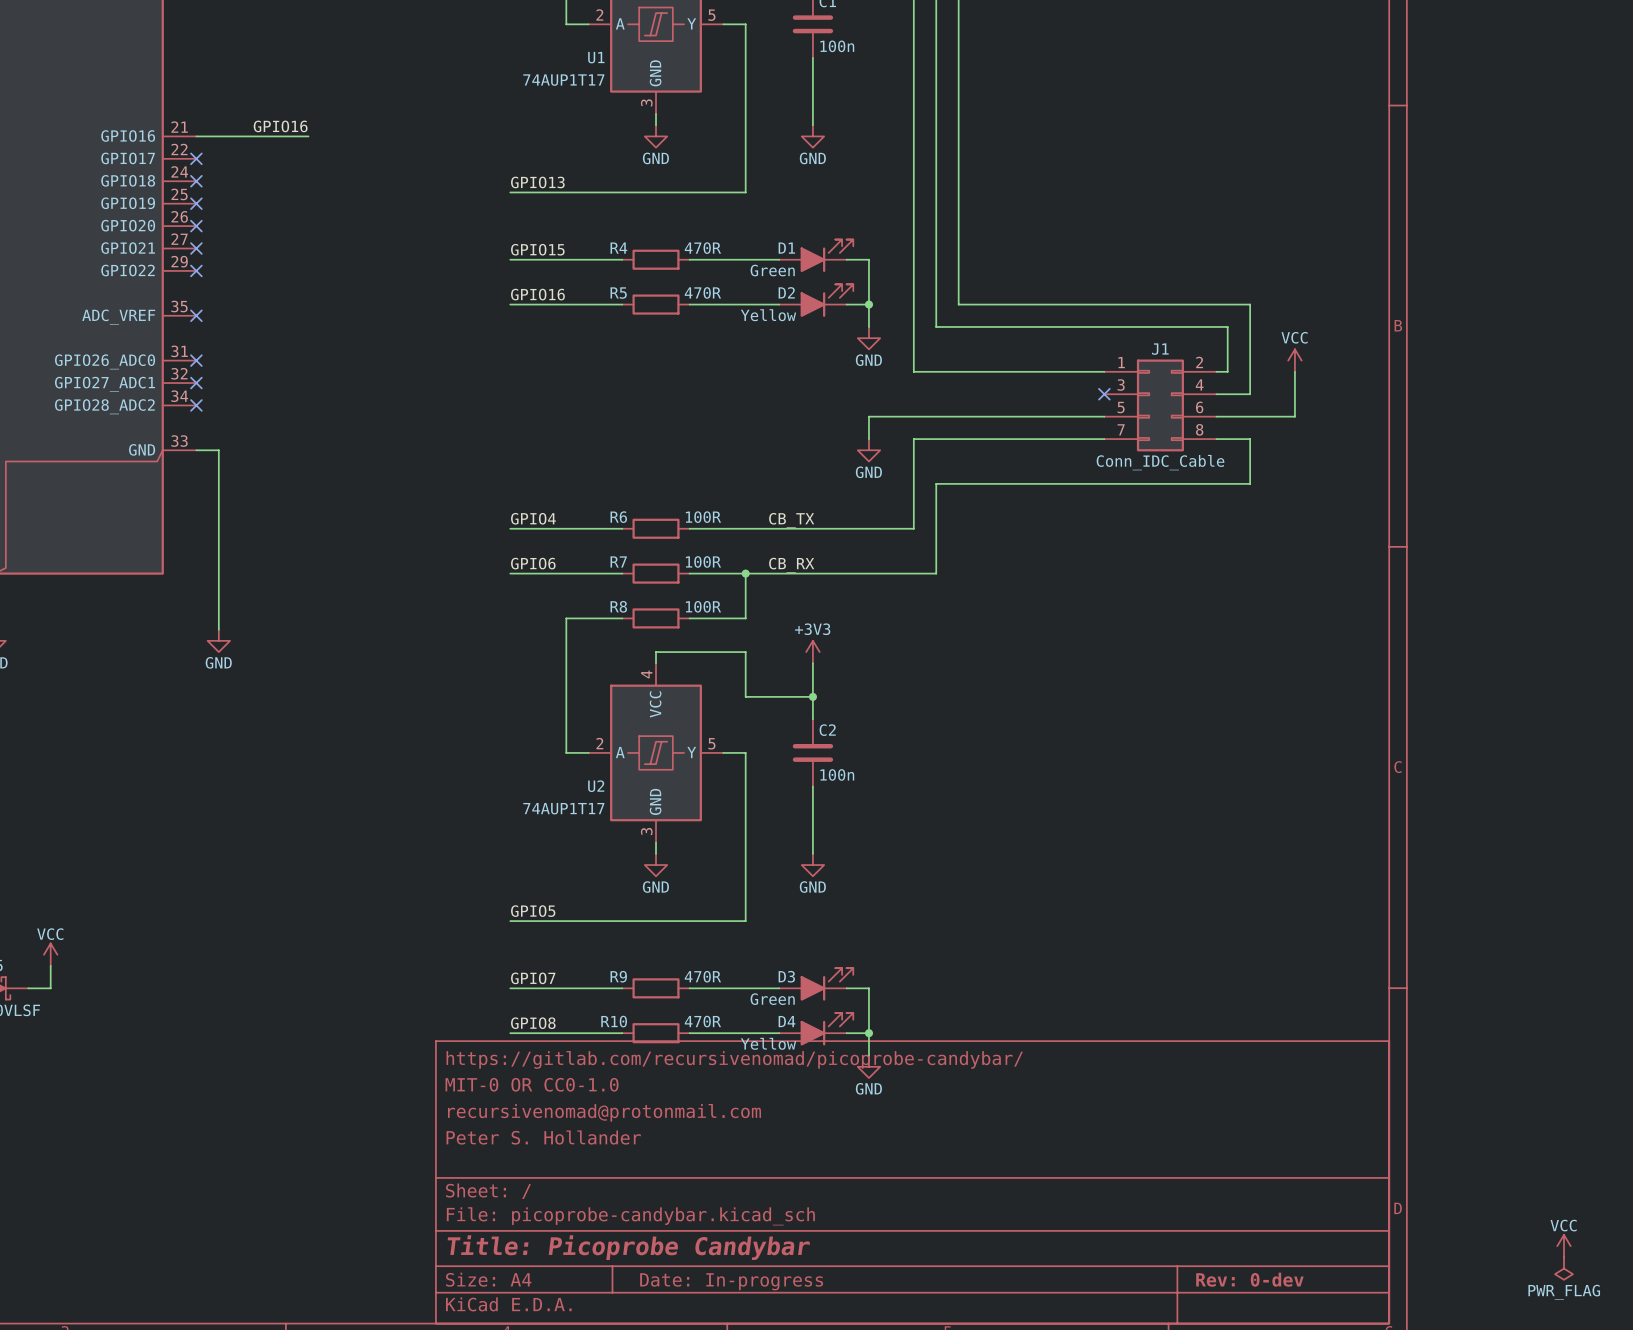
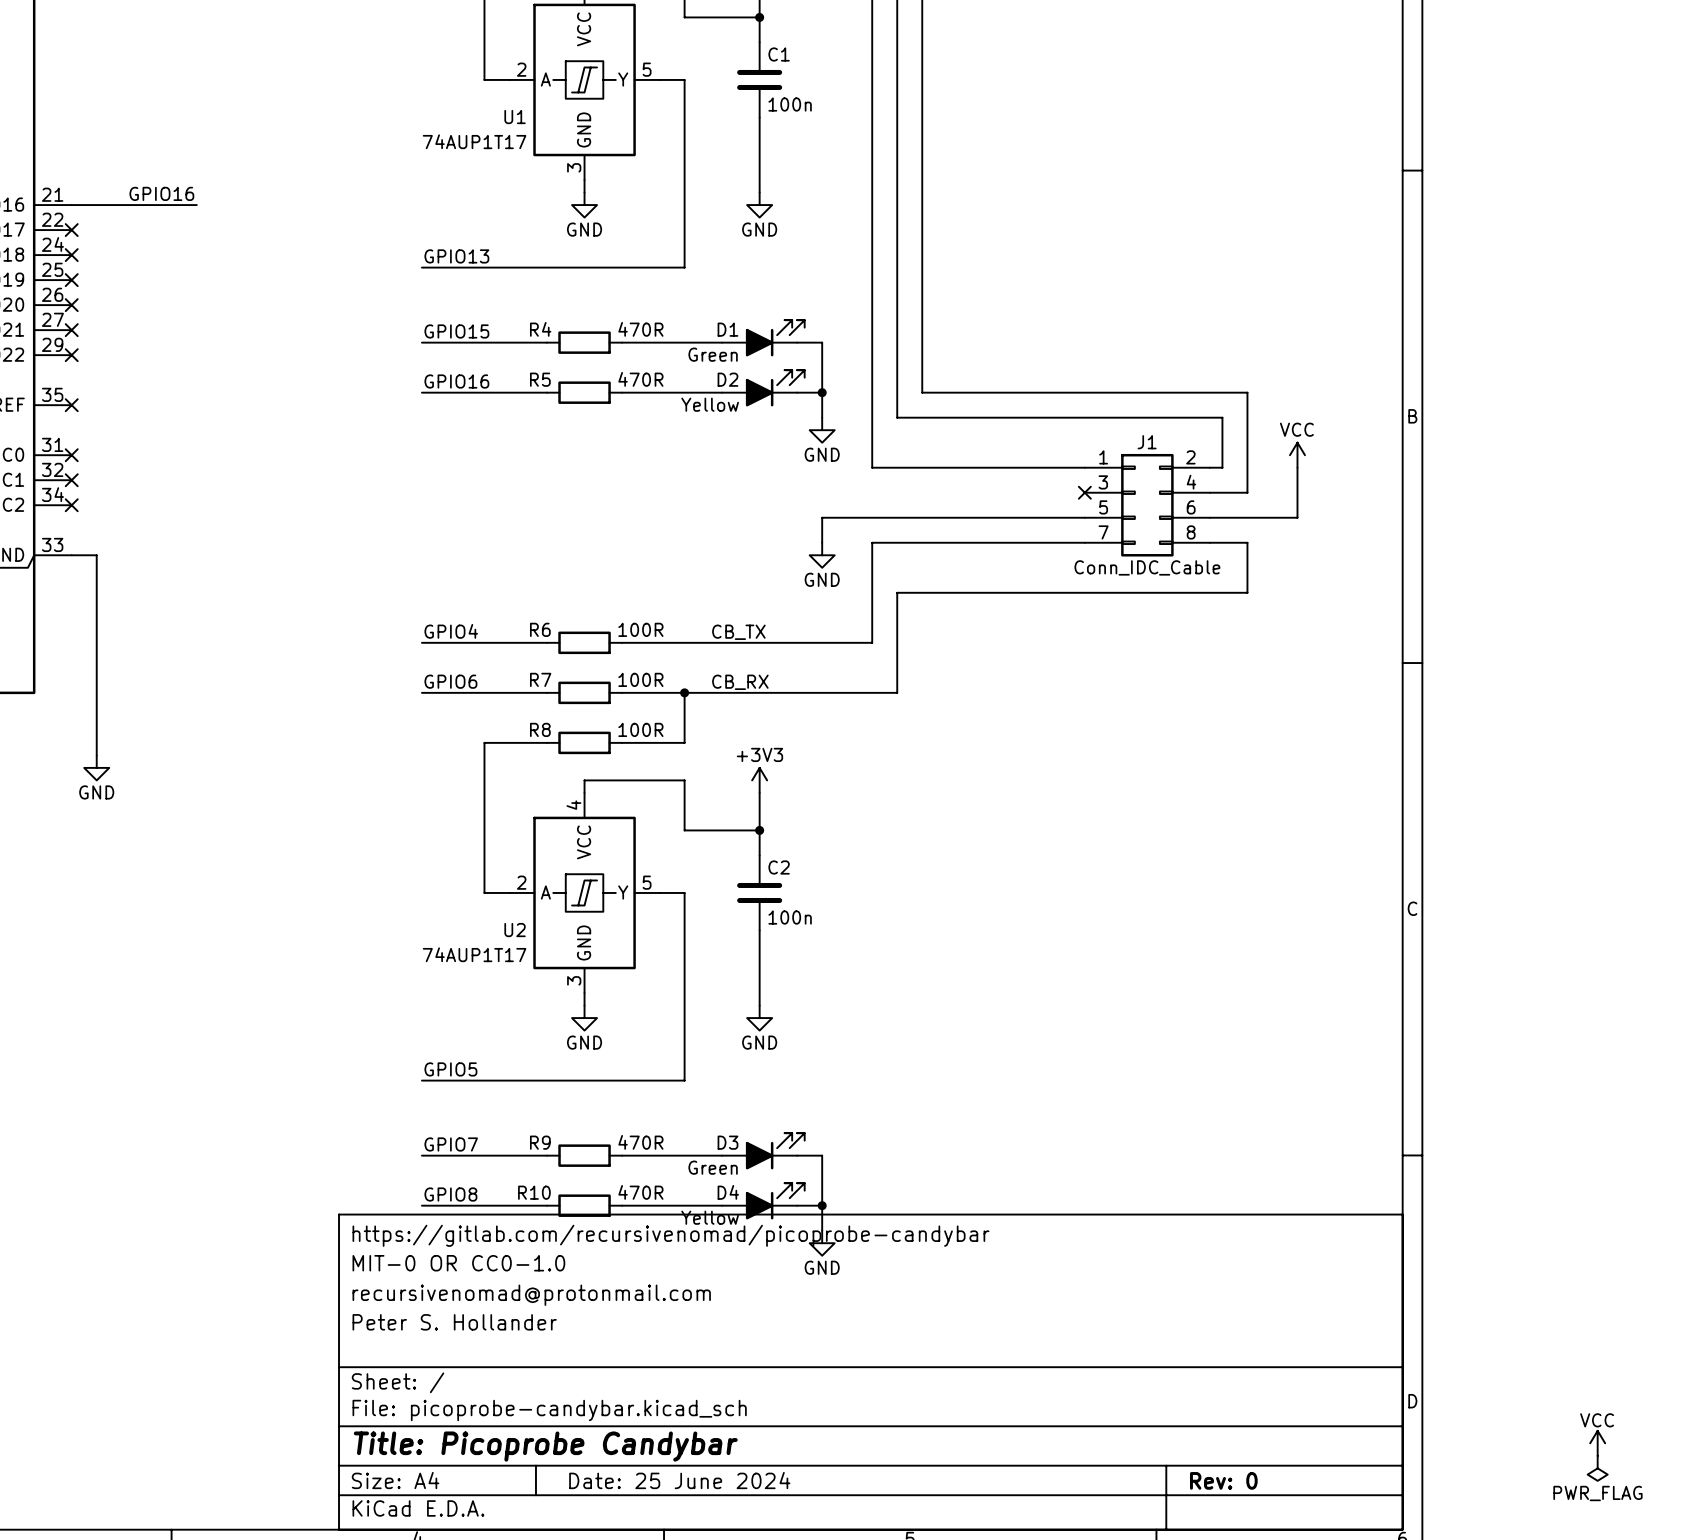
title block: https://gitlab.com/recursivenomad/picoprobe-candybar/ (734, 1059) -> https://gitlab.com/recursivenomad/picoprobe-candybar (670, 1235)
title block: Rev: 0-dev (1249, 1279) -> Rev: 0 (1223, 1480)
title block: Date: In-progress (731, 1281) -> Date: 25 June 2024 (679, 1480)

